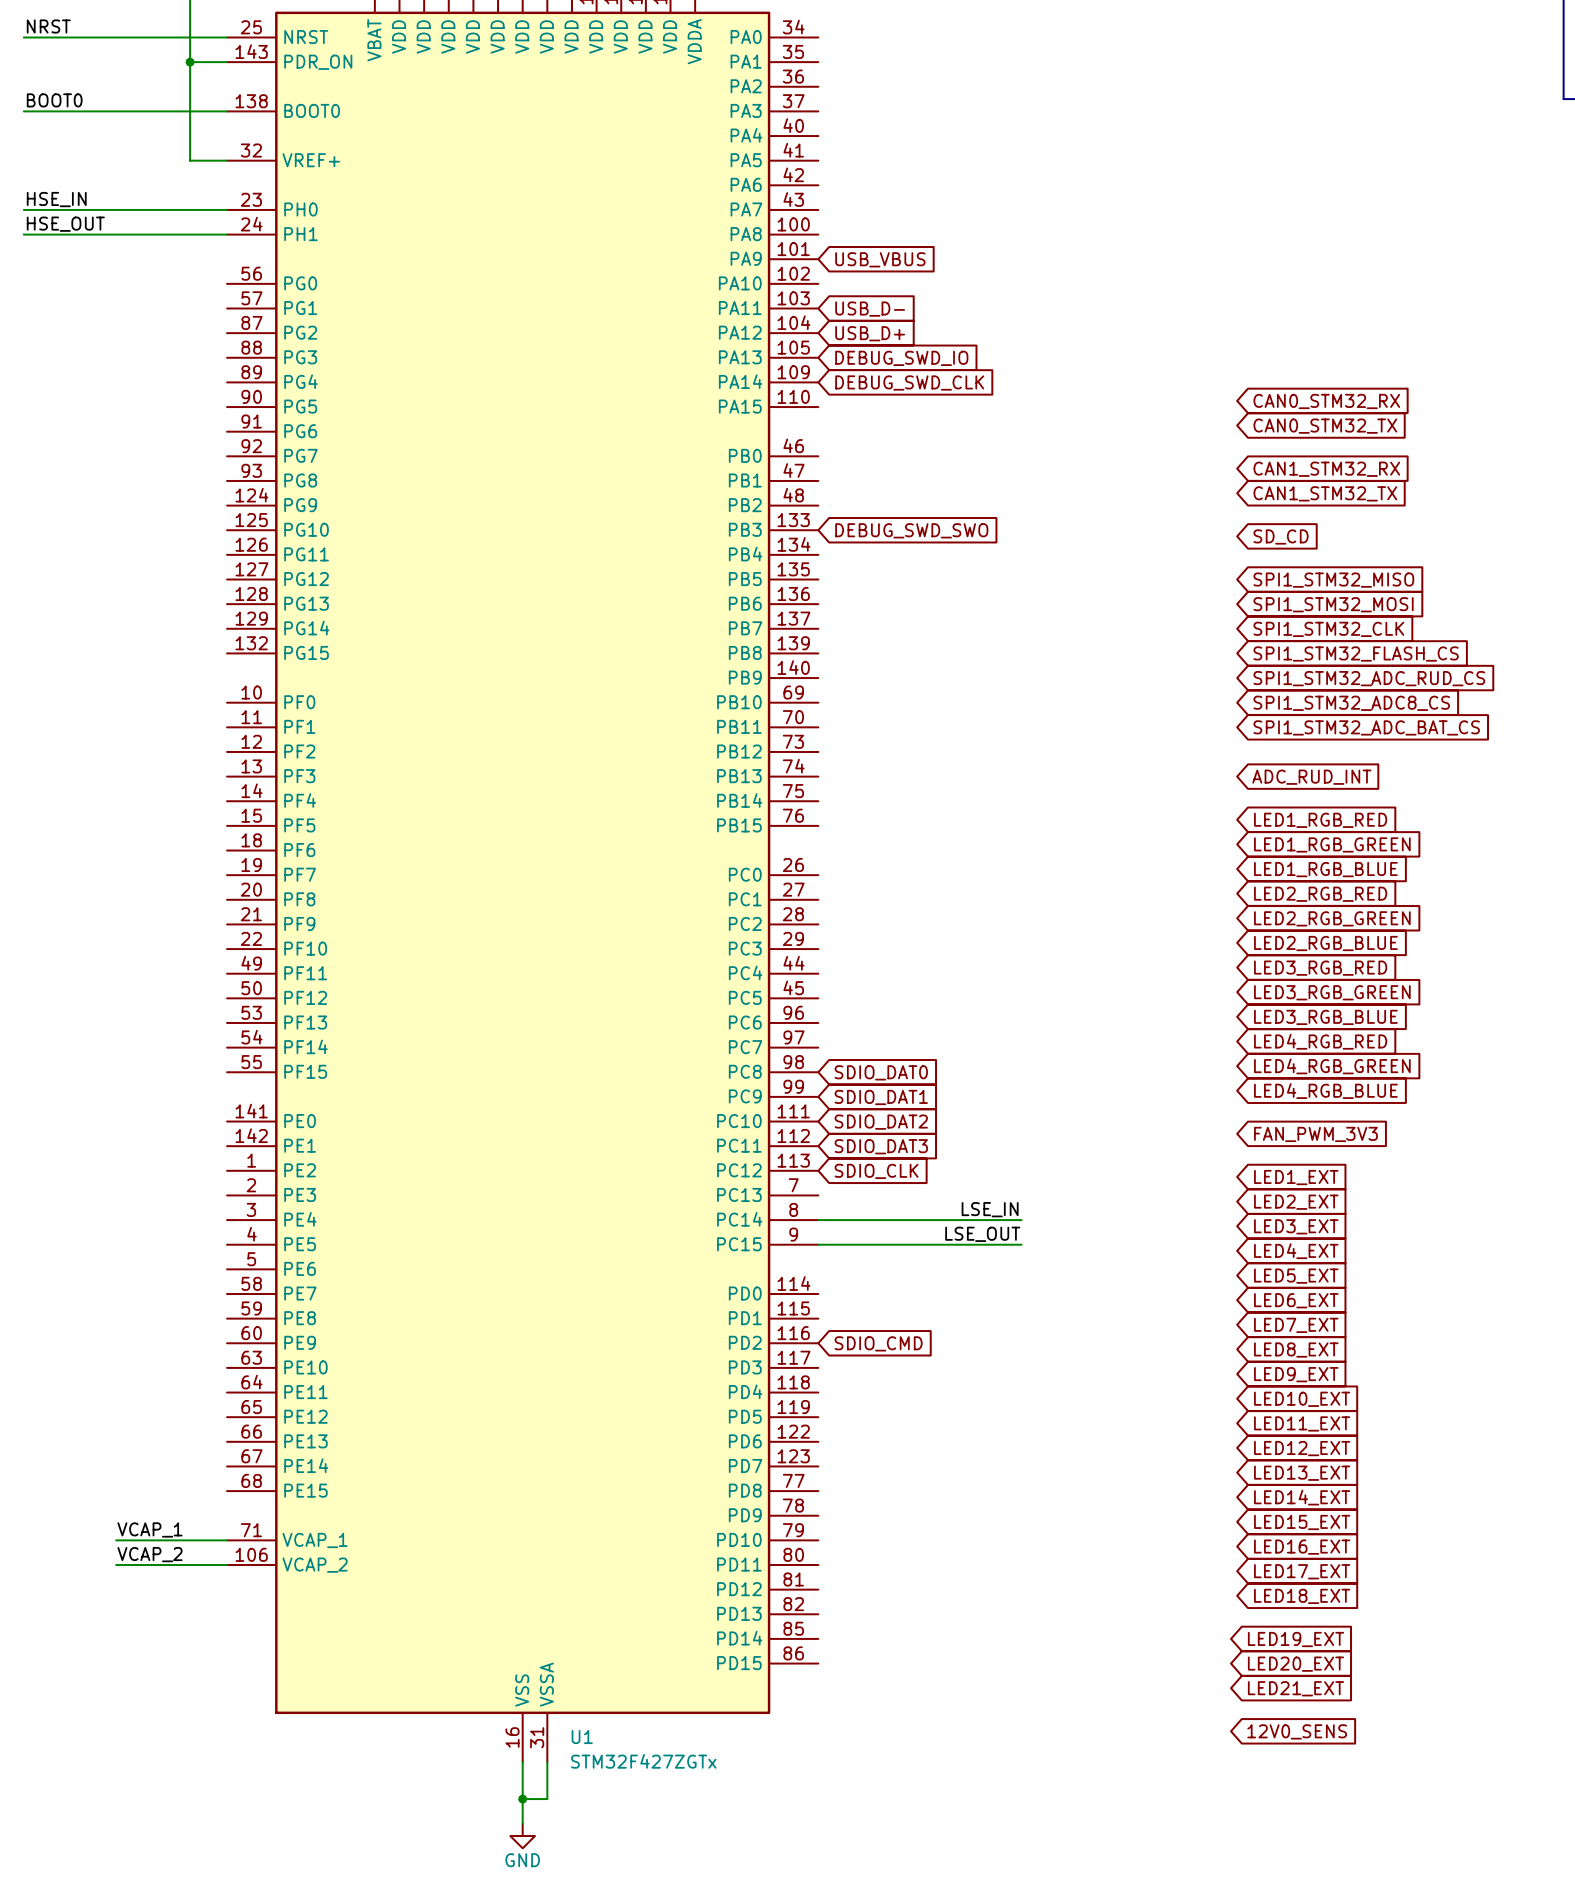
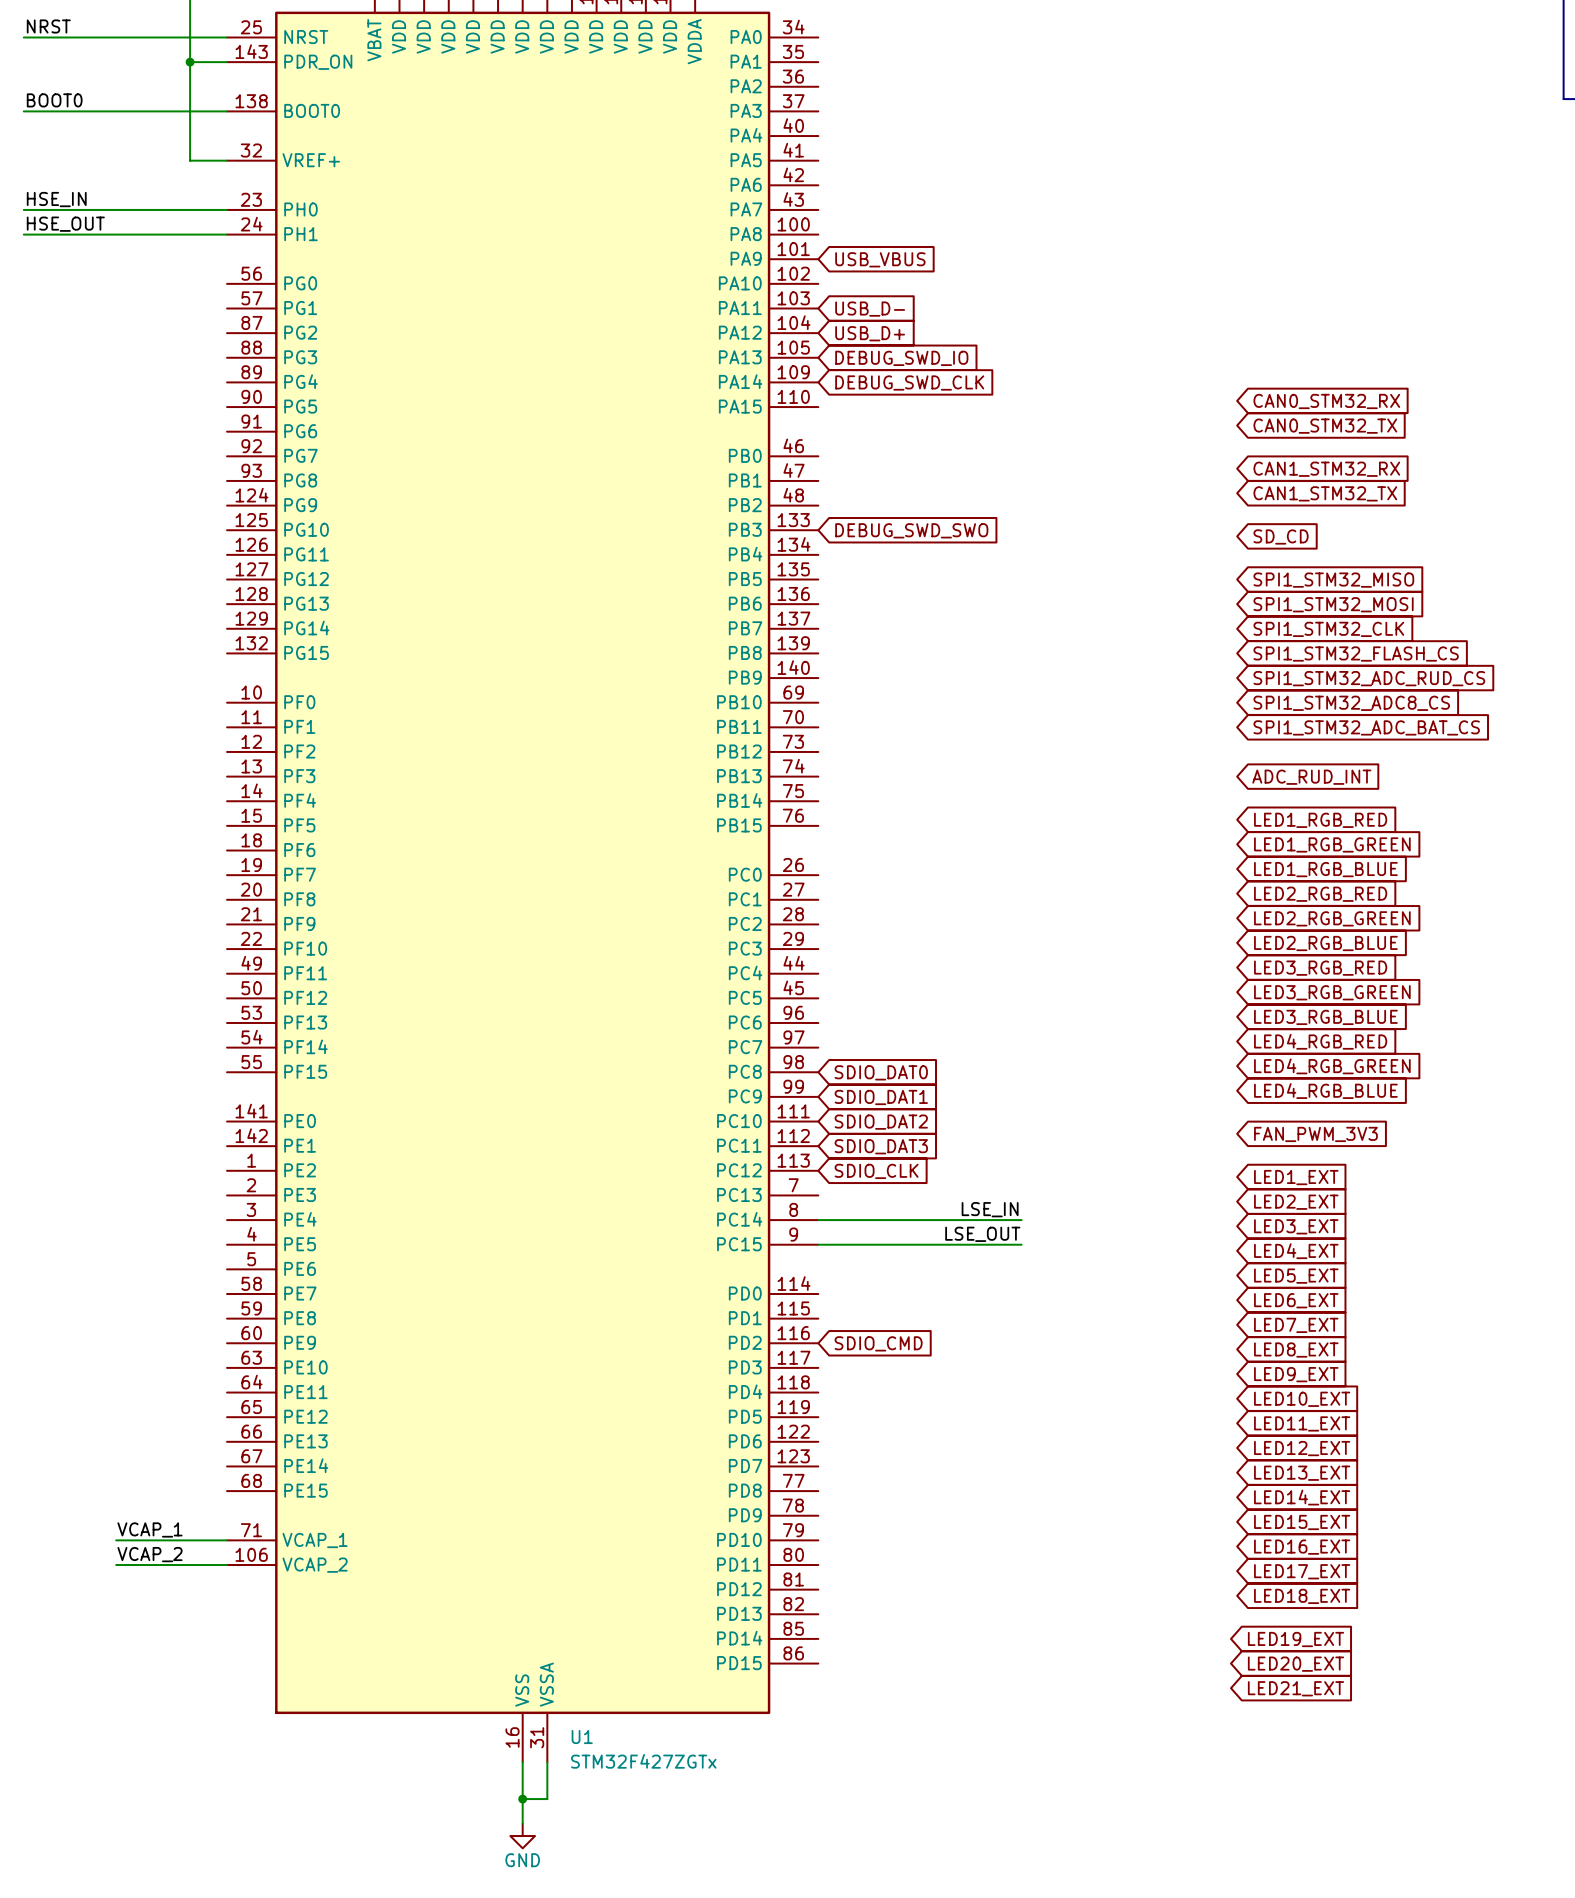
global label: 12V0_SENS (1297, 1731) -> none

